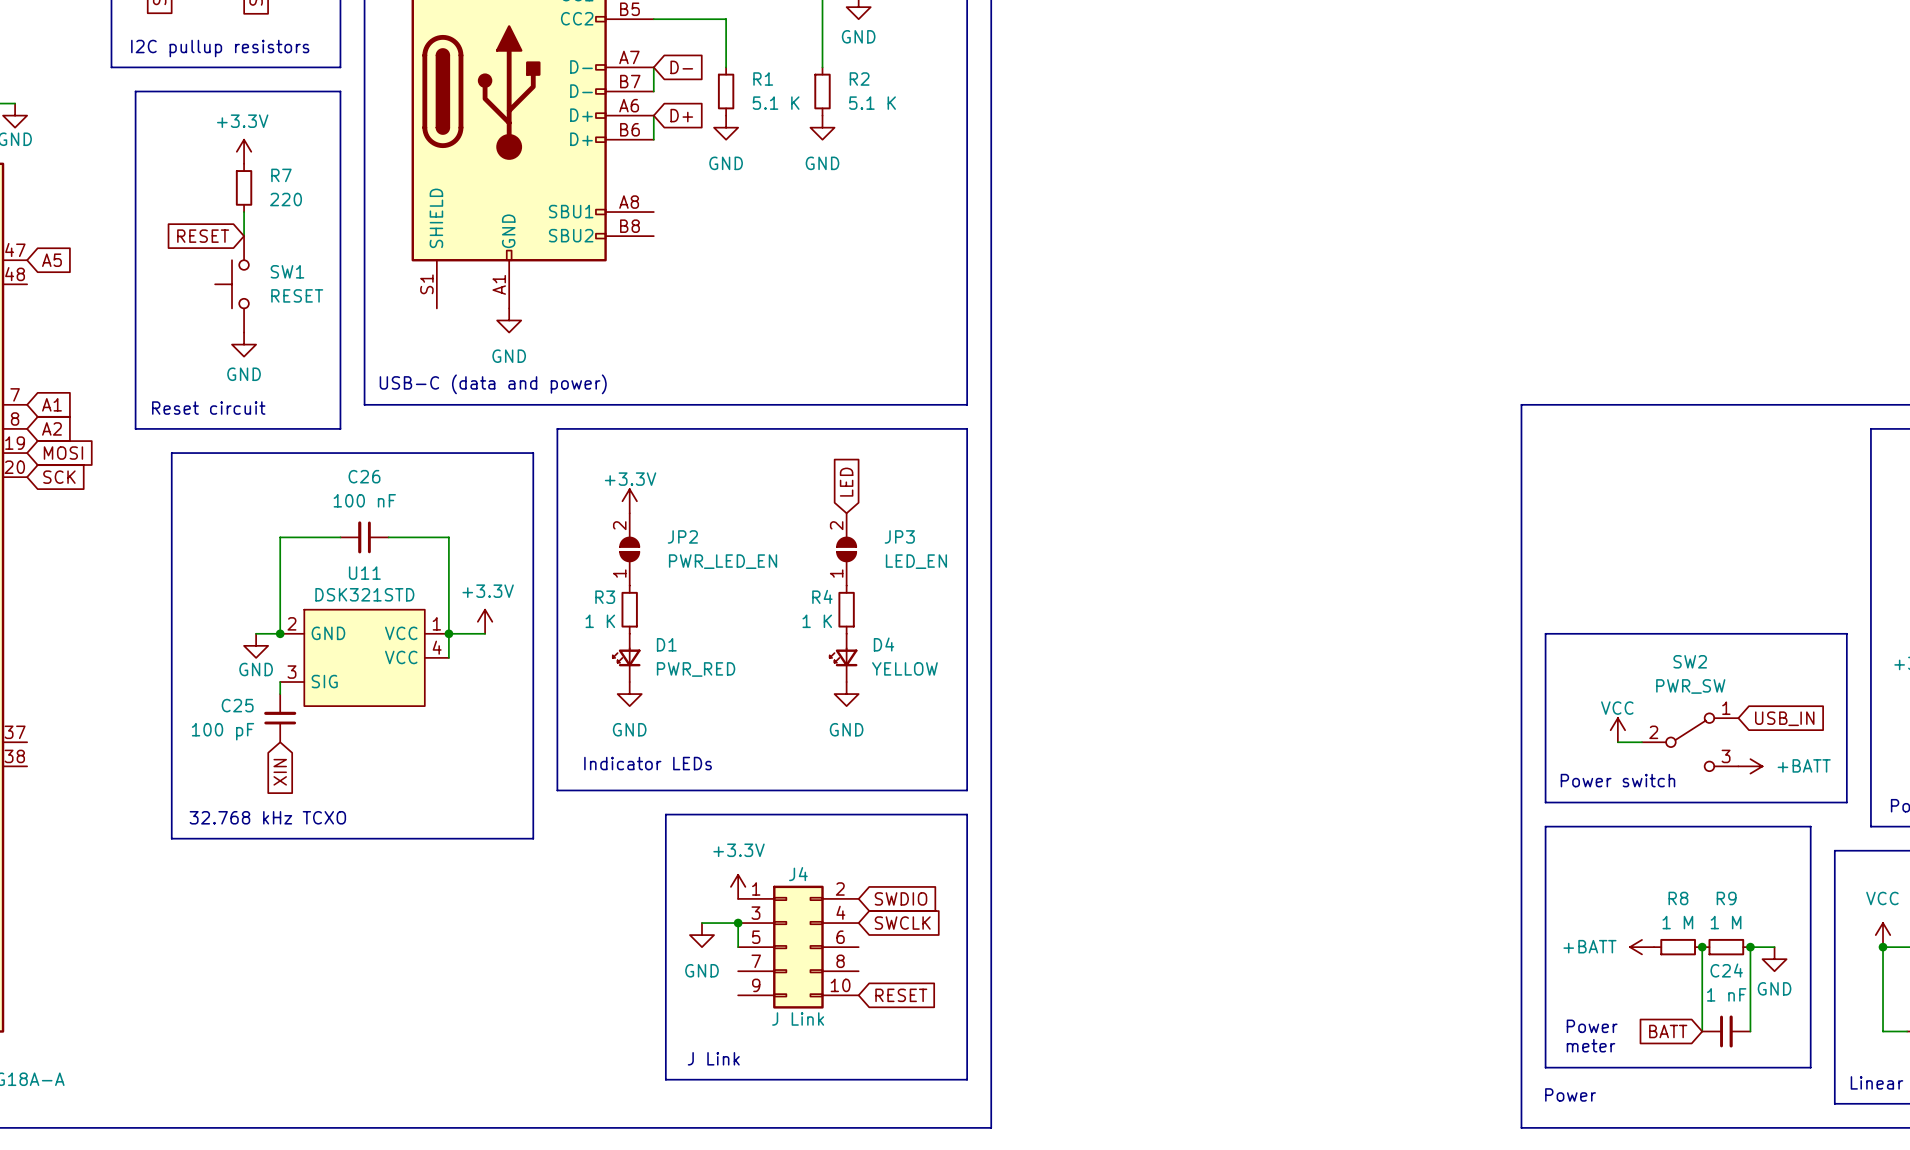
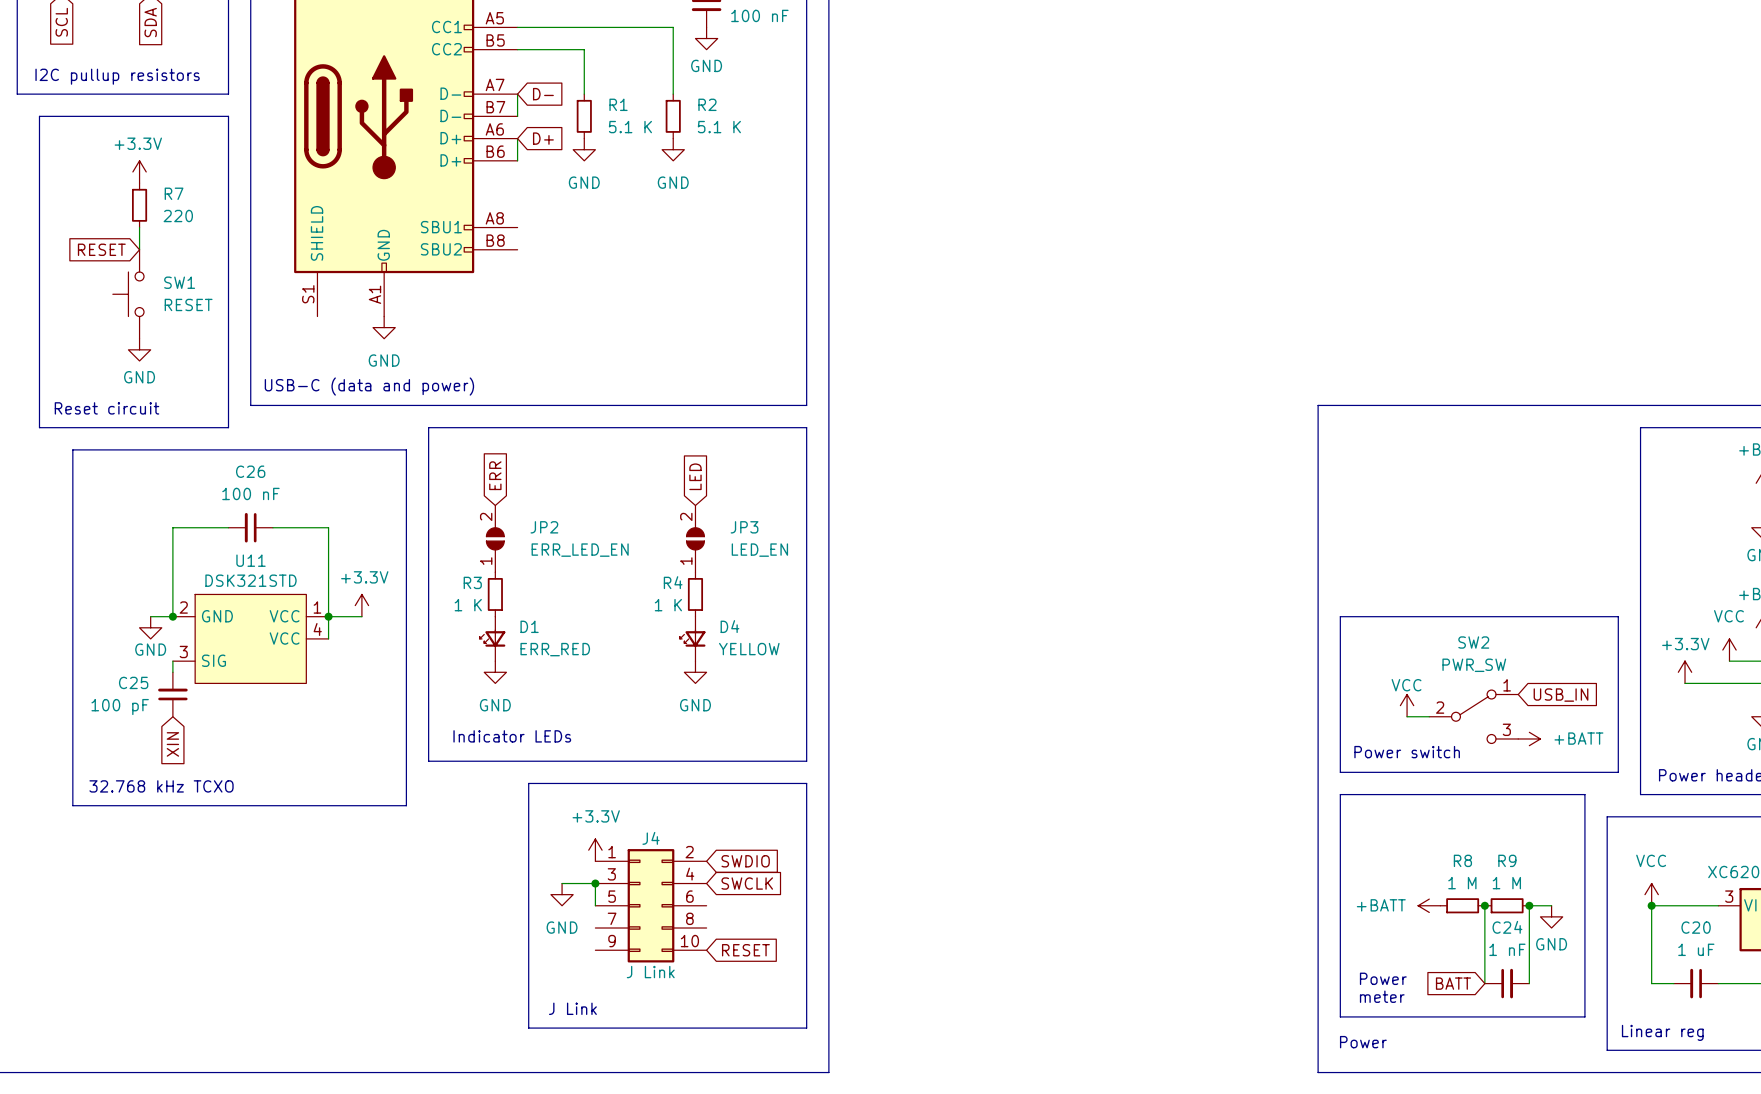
global label: none -> ERR (495, 475)
power symbol: +3.3V (629, 501) -> none
JP2 value: PWR_LED_EN (723, 561) -> ERR_LED_EN (580, 550)
D1 value: PWR_RED (696, 669) -> ERR_RED (555, 649)

